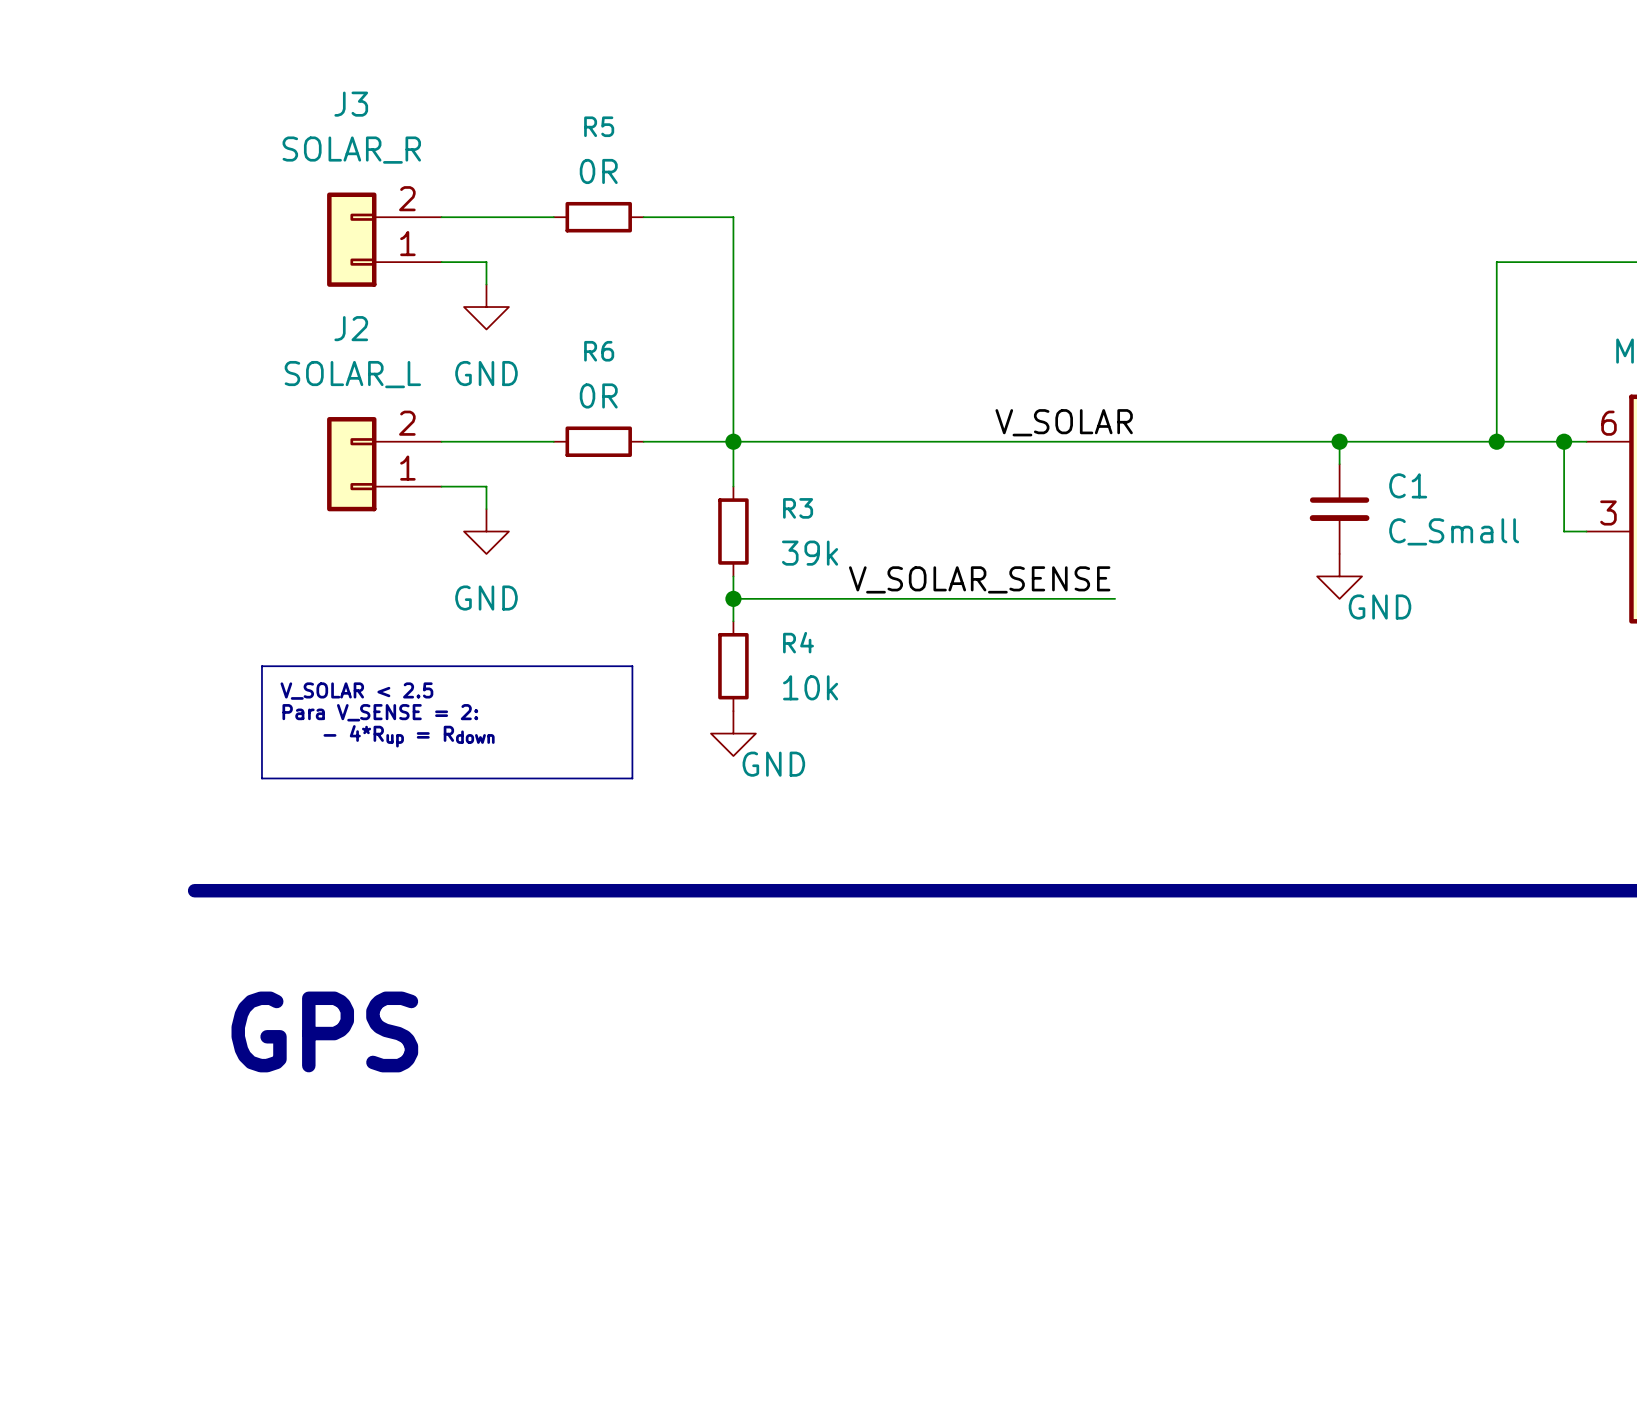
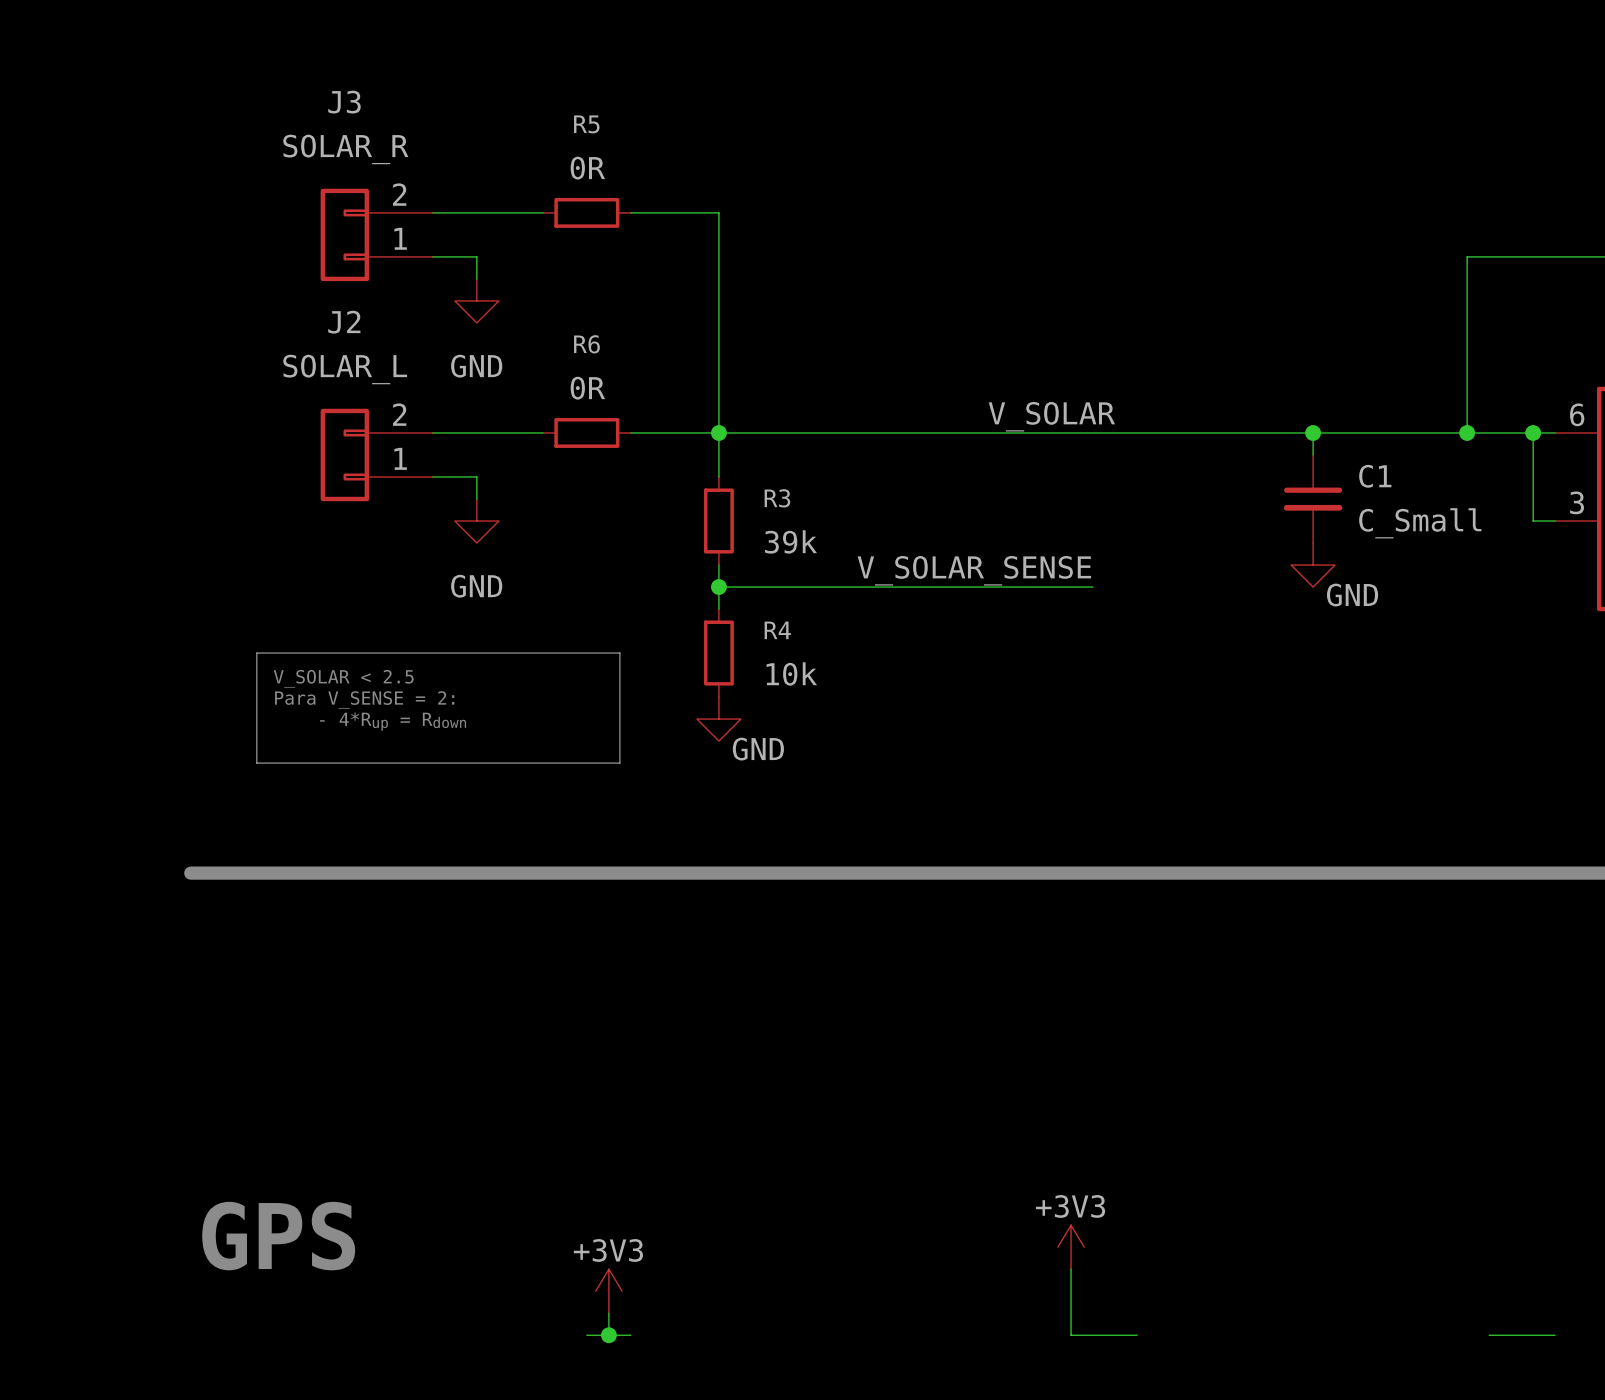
text position: GPS (324, 1031) -> GPS (278, 1236)
power symbol: none -> +3V3 (1071, 1247)
wire: none -> (1071, 1269) (1071, 1335) (1137, 1335)
power symbol: none -> +3V3 (608, 1291)
wire: none -> (608, 1313) (608, 1335)
wire: none -> (586, 1335) (630, 1335)
junction: none -> (608, 1335)
wire: none -> (1489, 1335) (1555, 1335)

